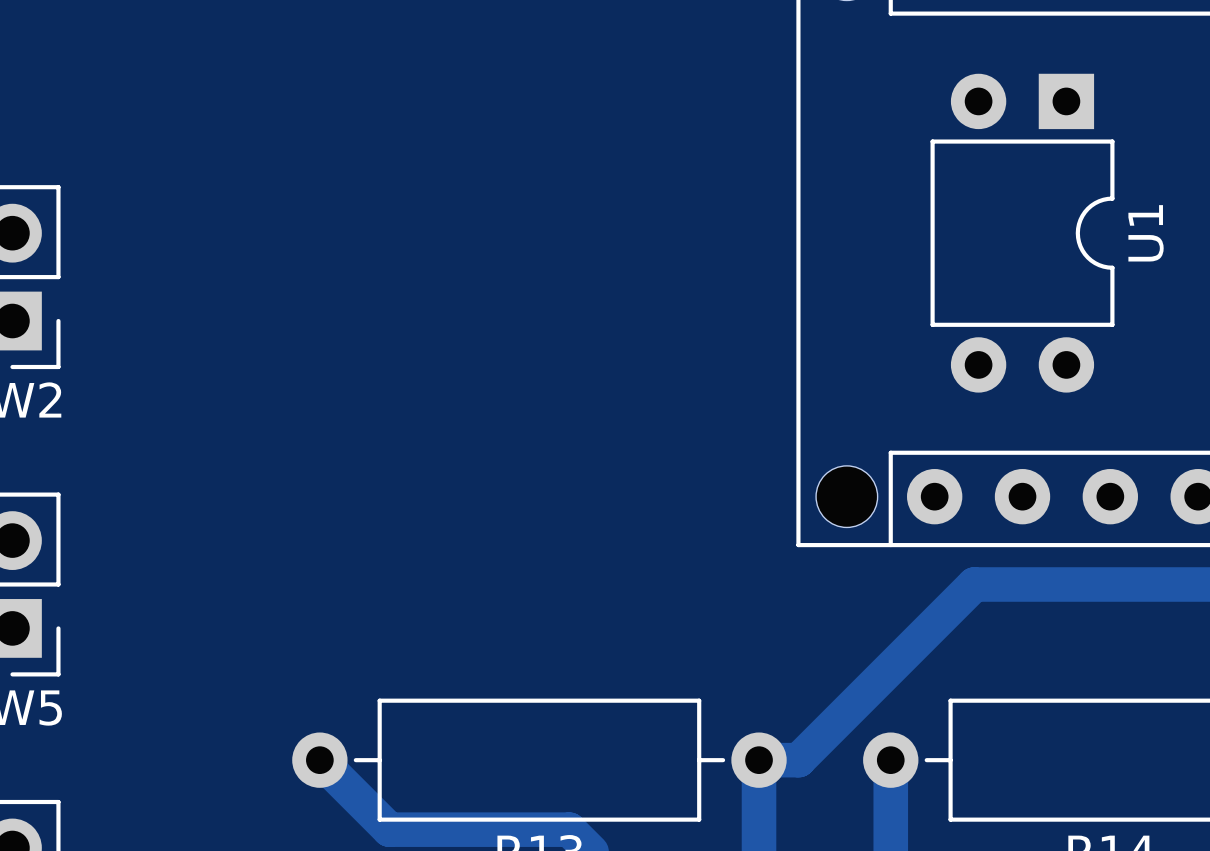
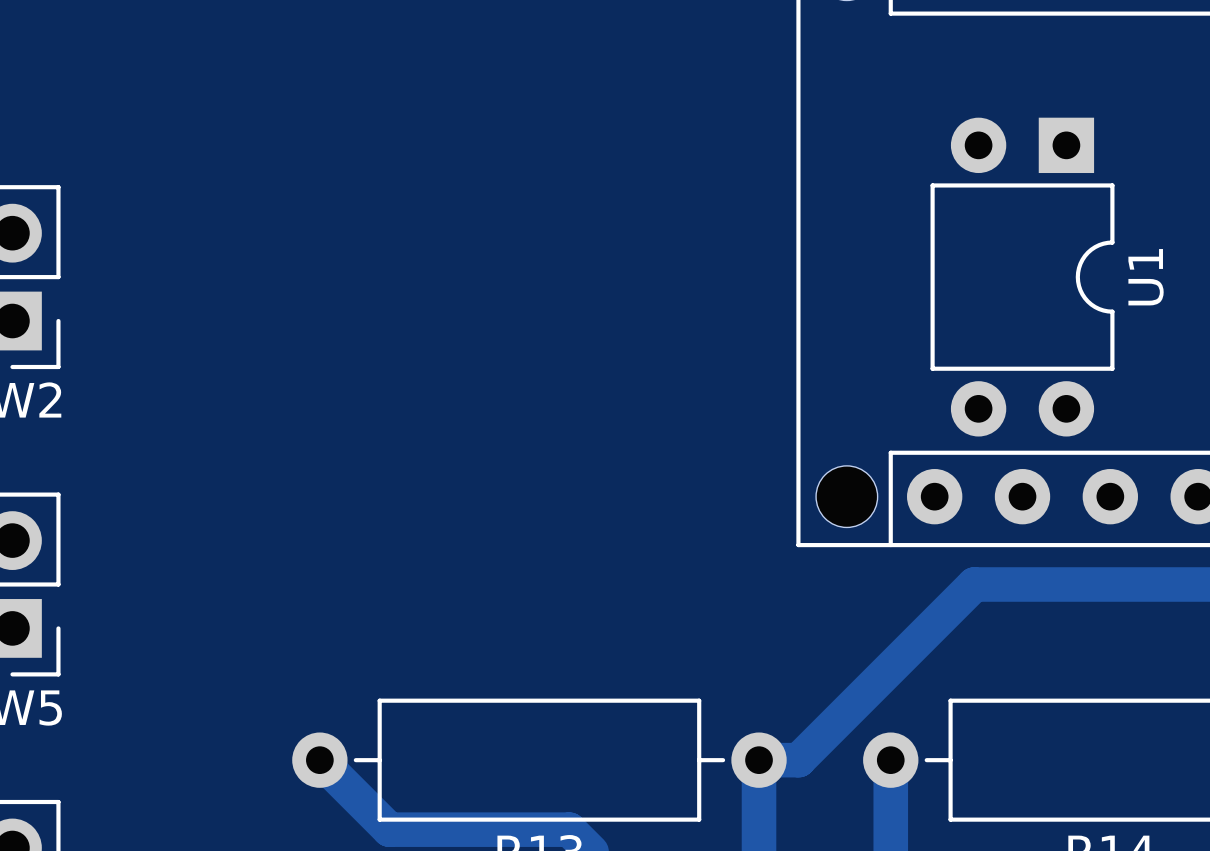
U1 position: (1022, 233) -> (1022, 277)

